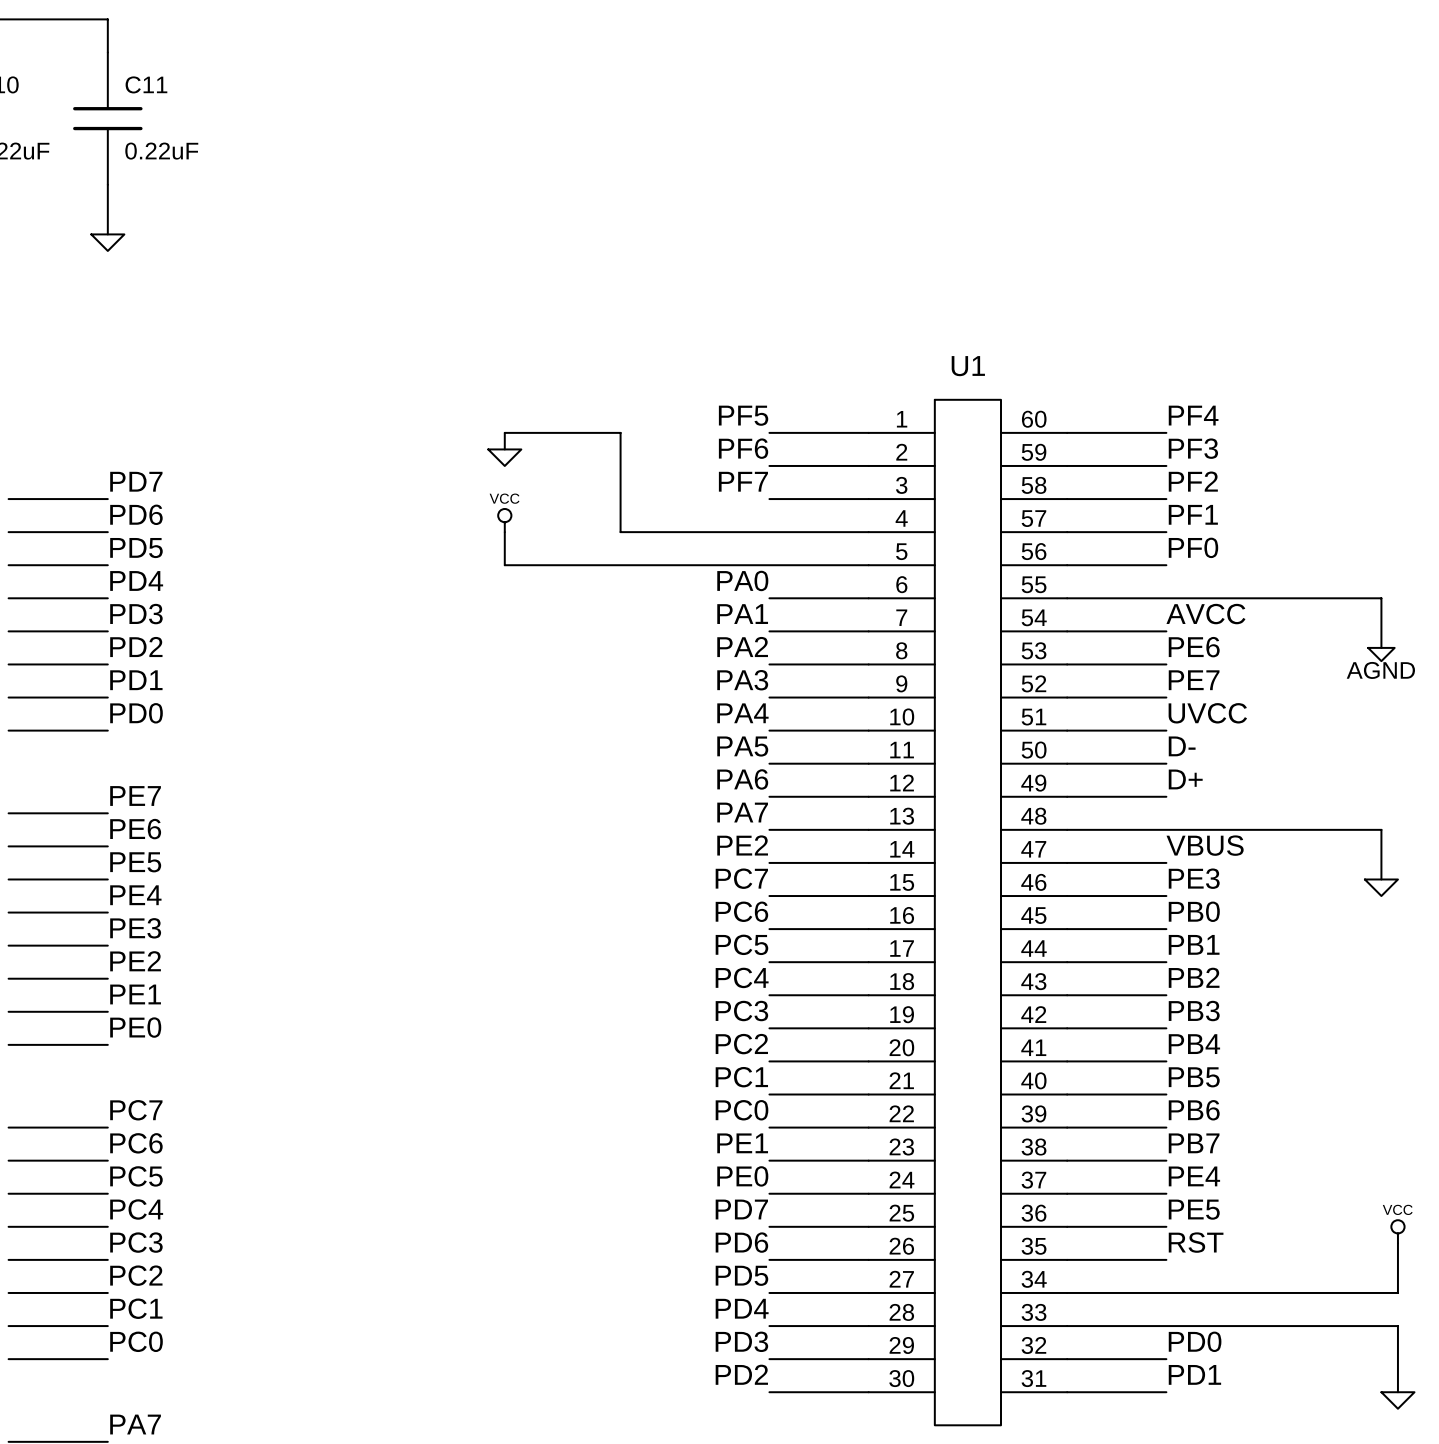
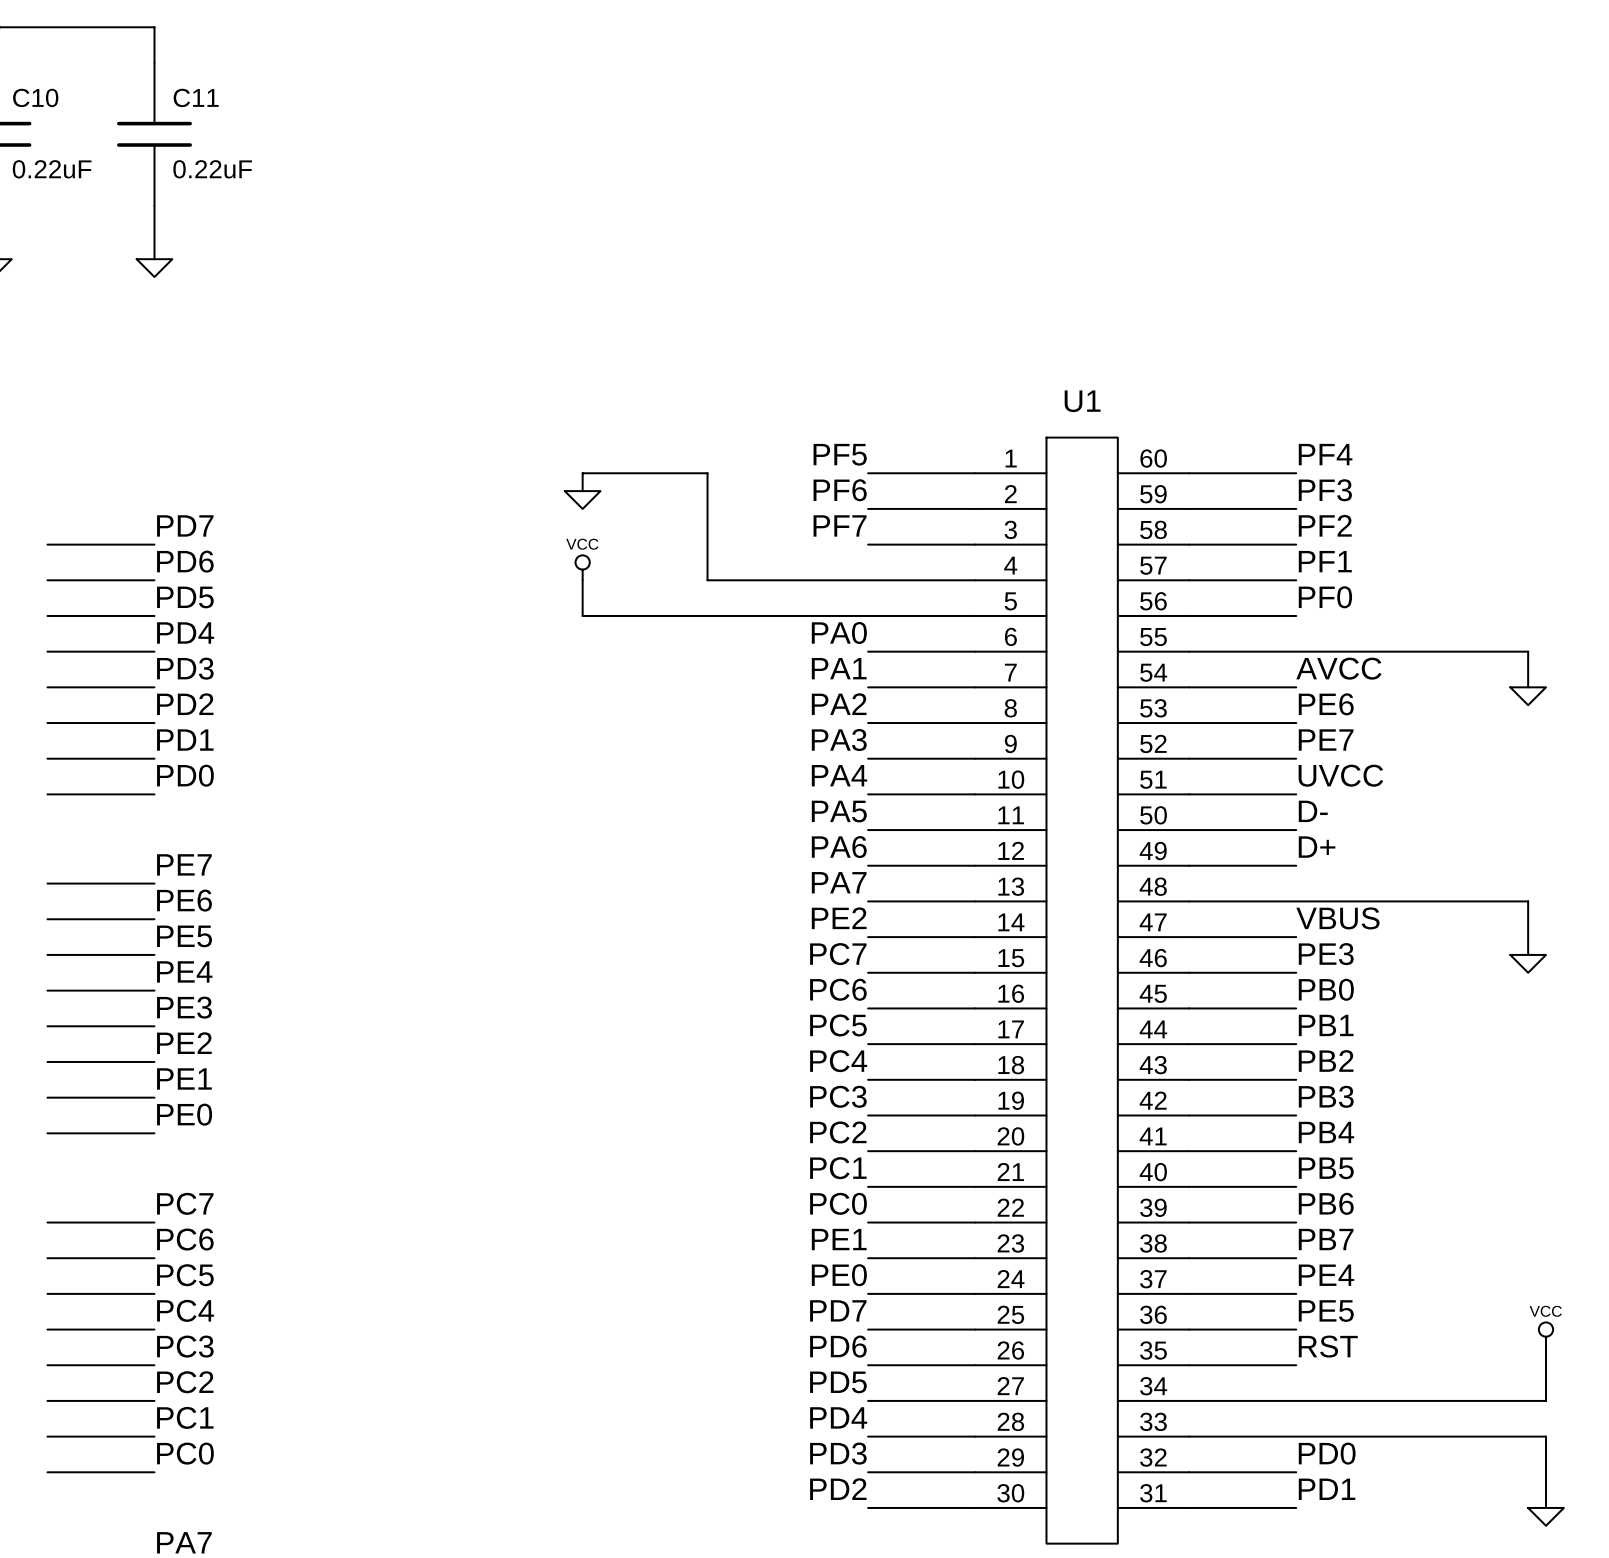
wire: (1381, 631) (1381, 647) -> none
power symbol: none -> (1528, 696)
power symbol: AGND (1381, 654) -> none

